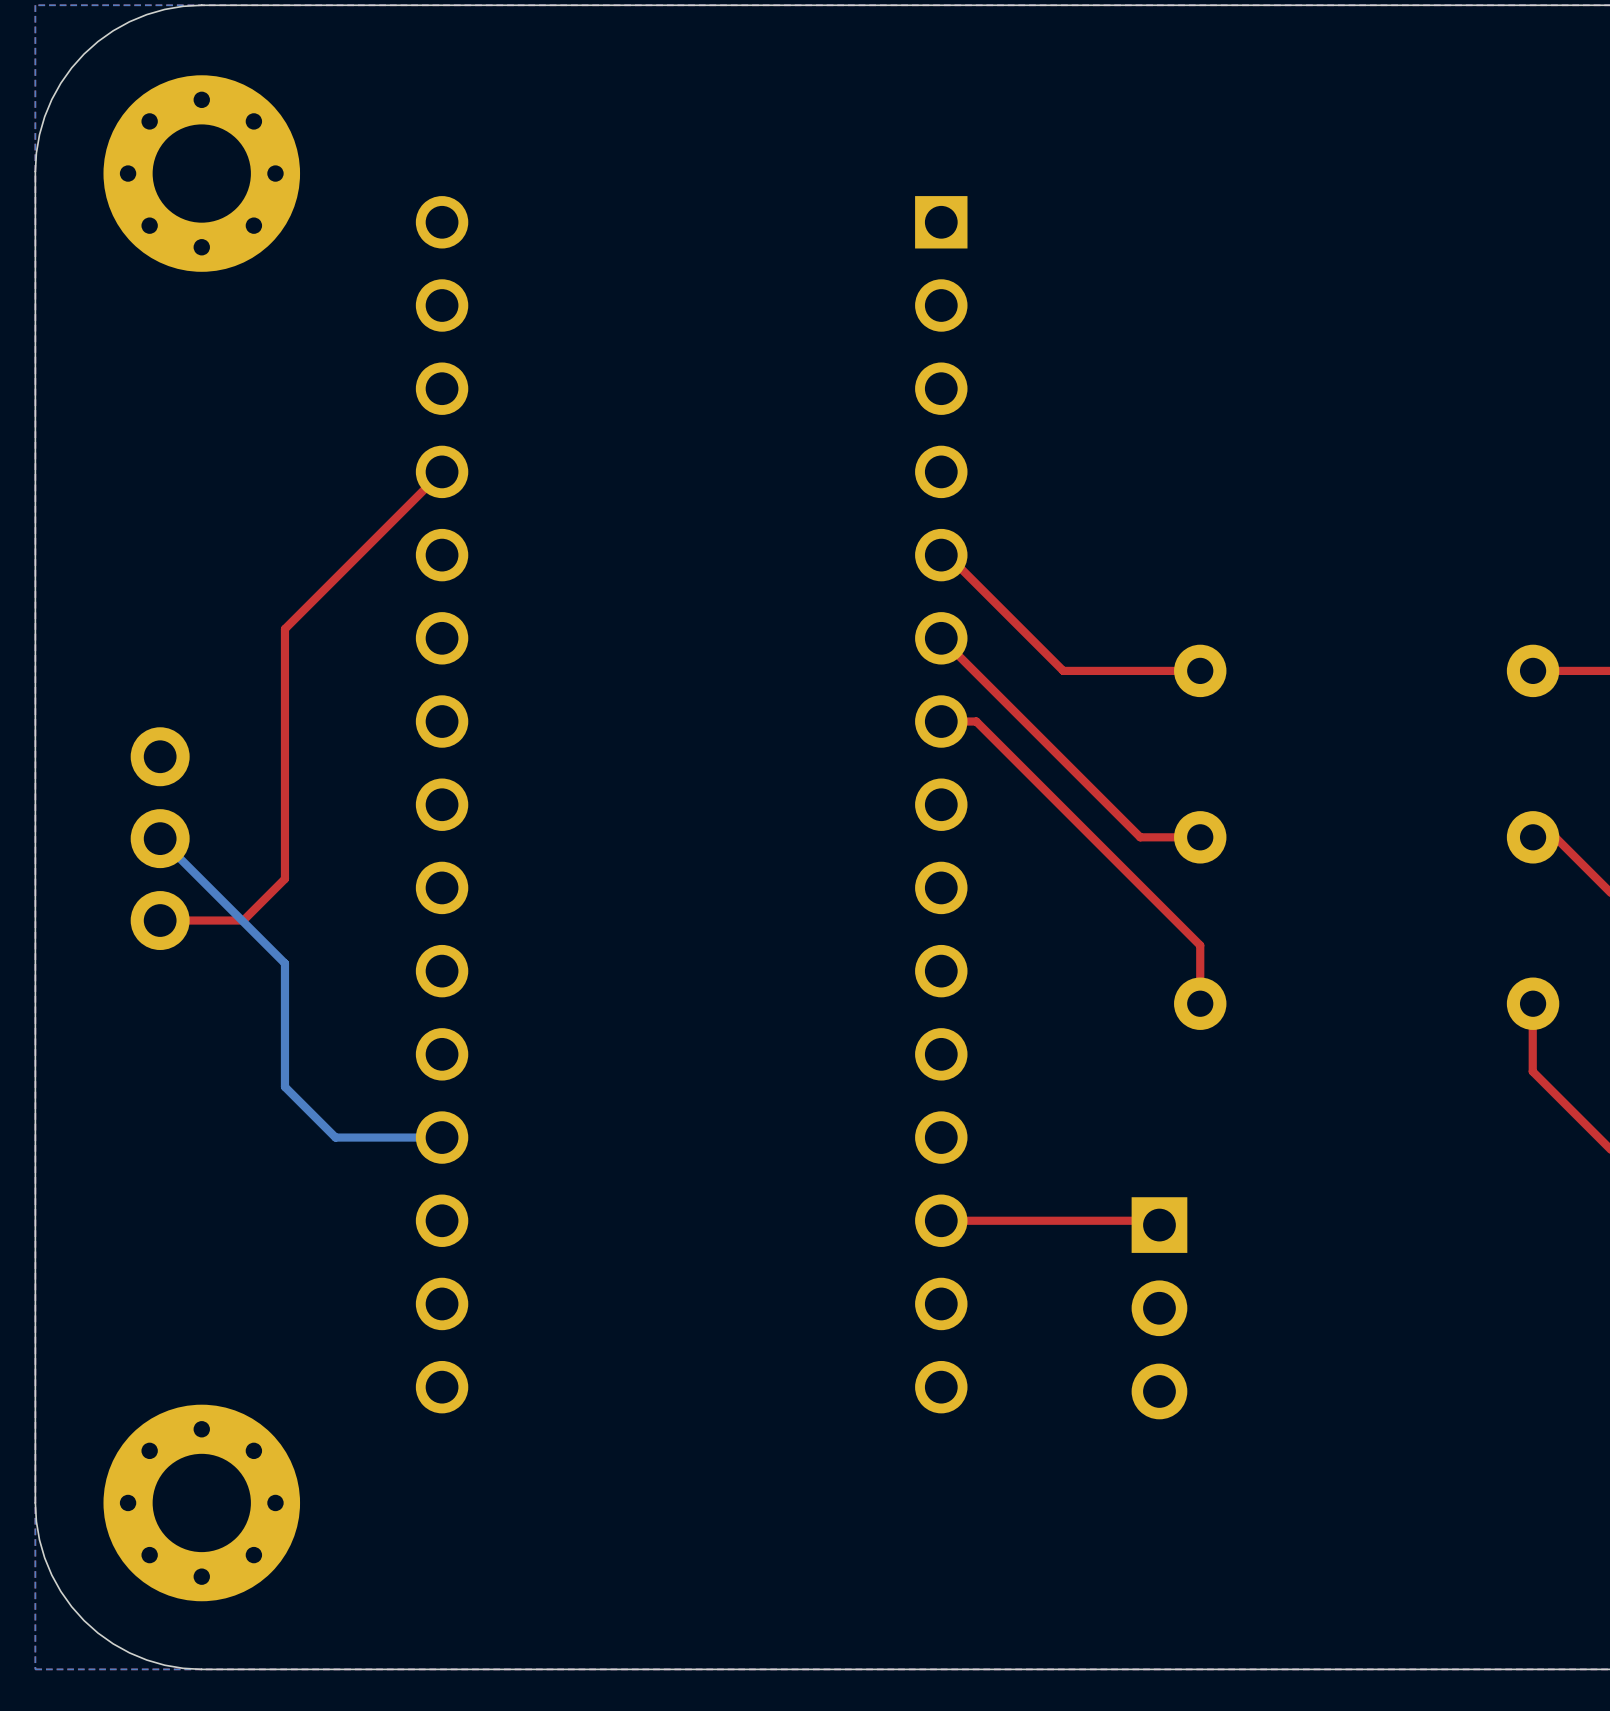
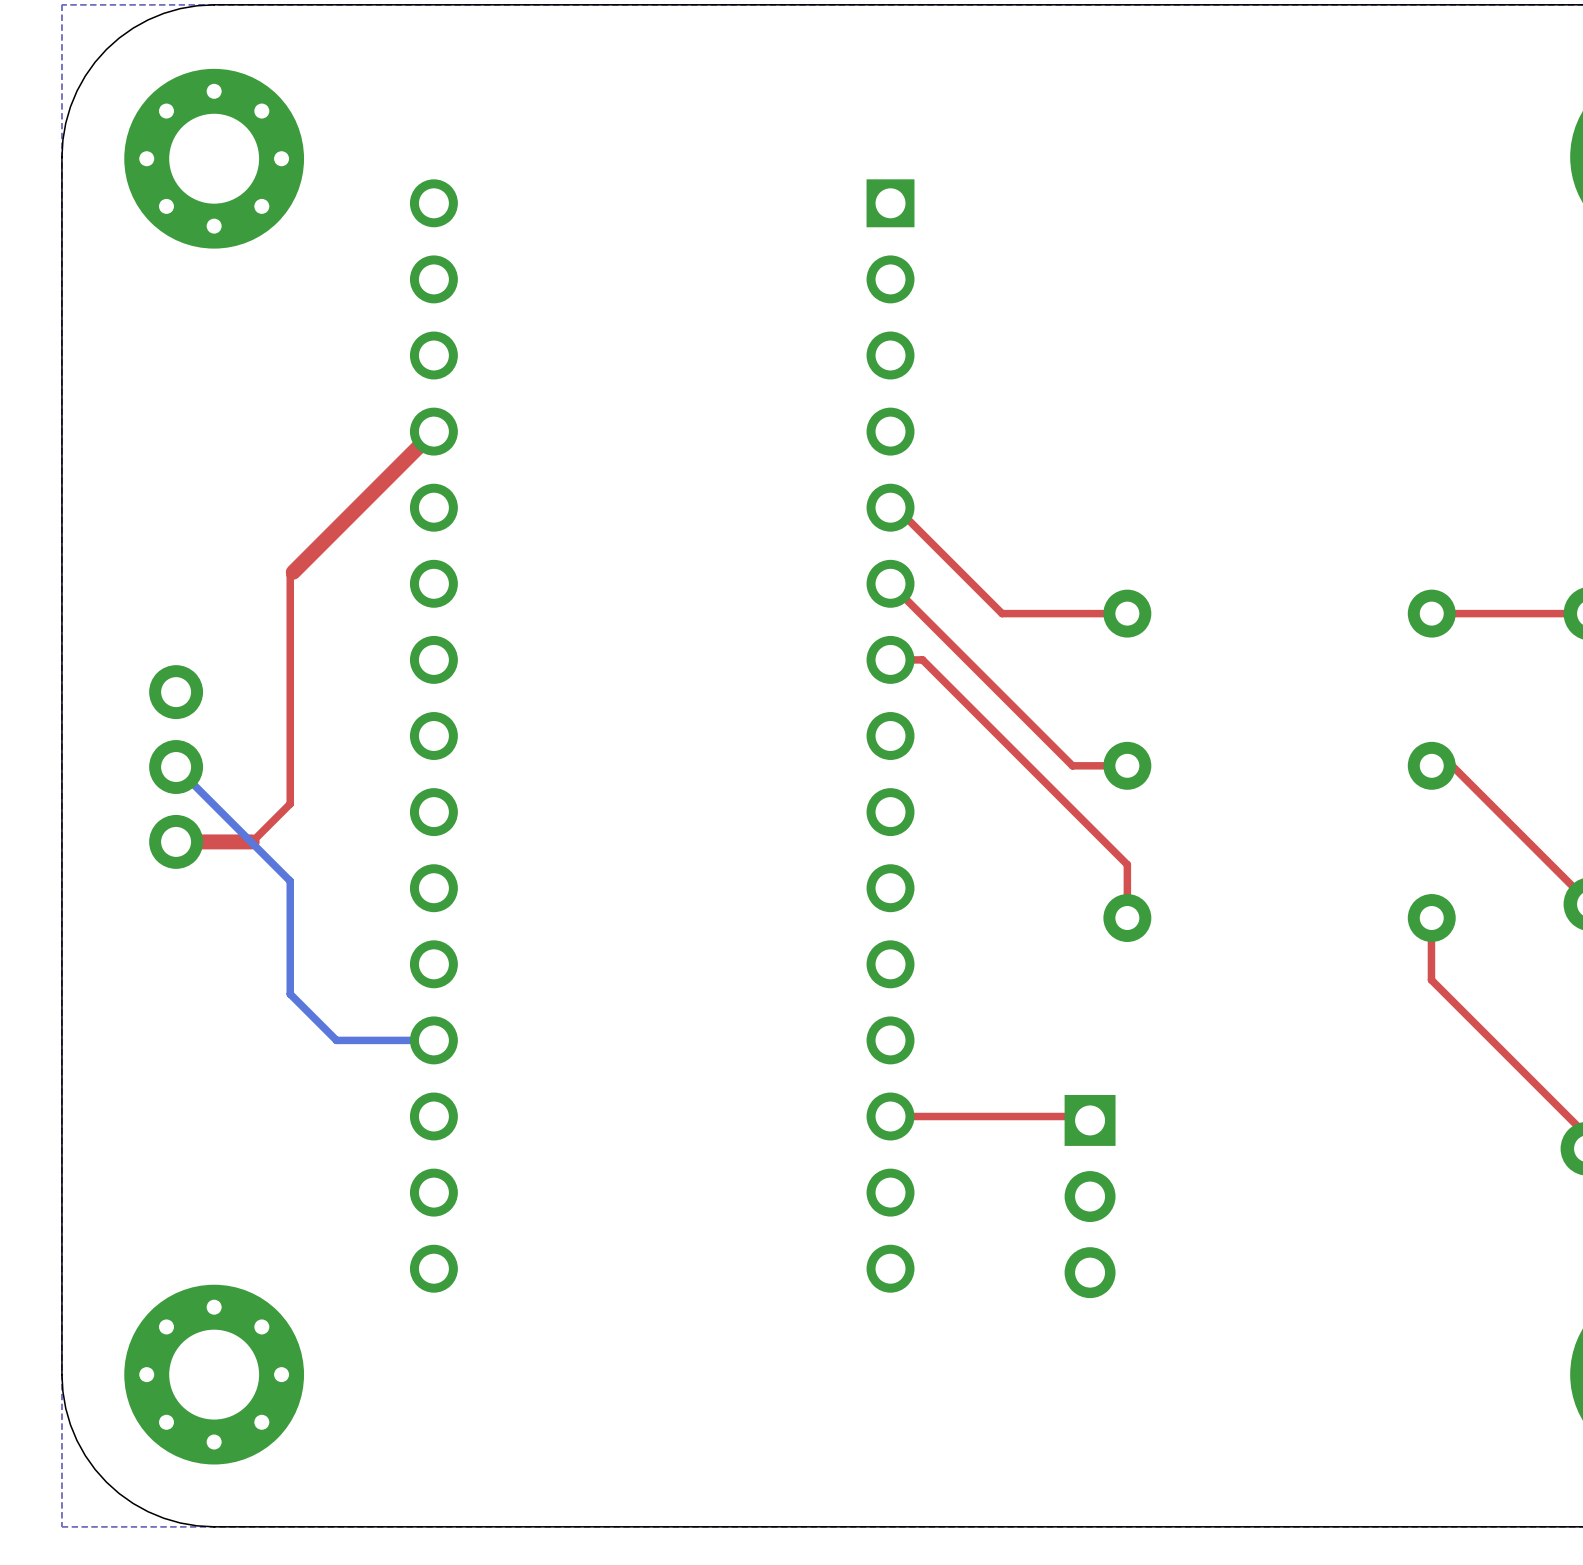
top track width: thin (442, 471) (288, 625) -> thick (433, 431) (293, 572)
top track width: thin (243, 920) (160, 920) -> thick (252, 841) (176, 841)

